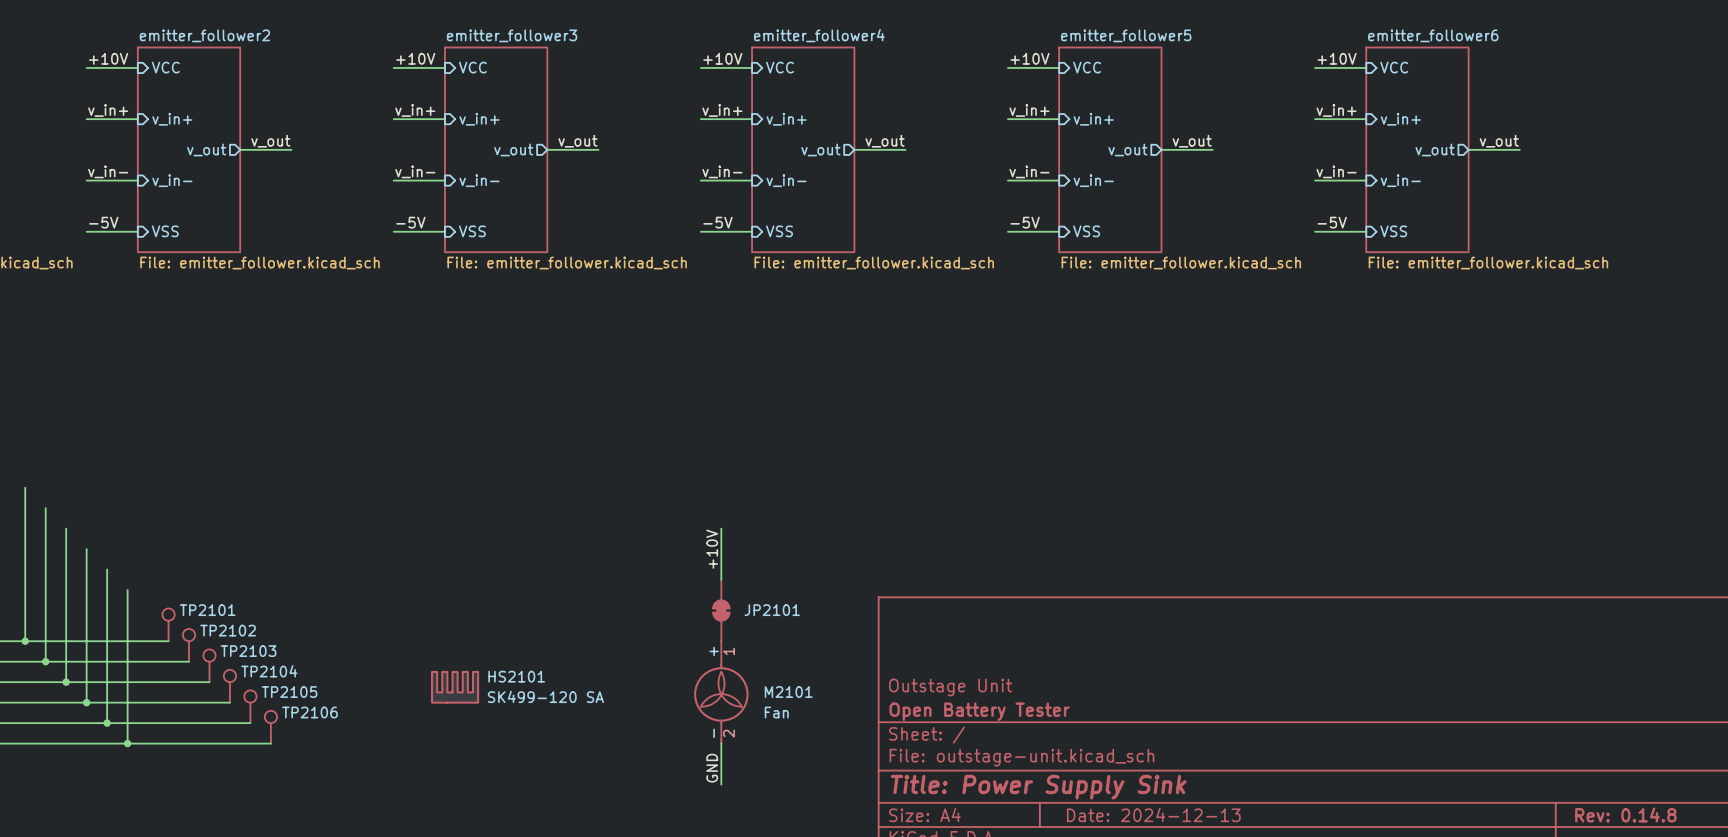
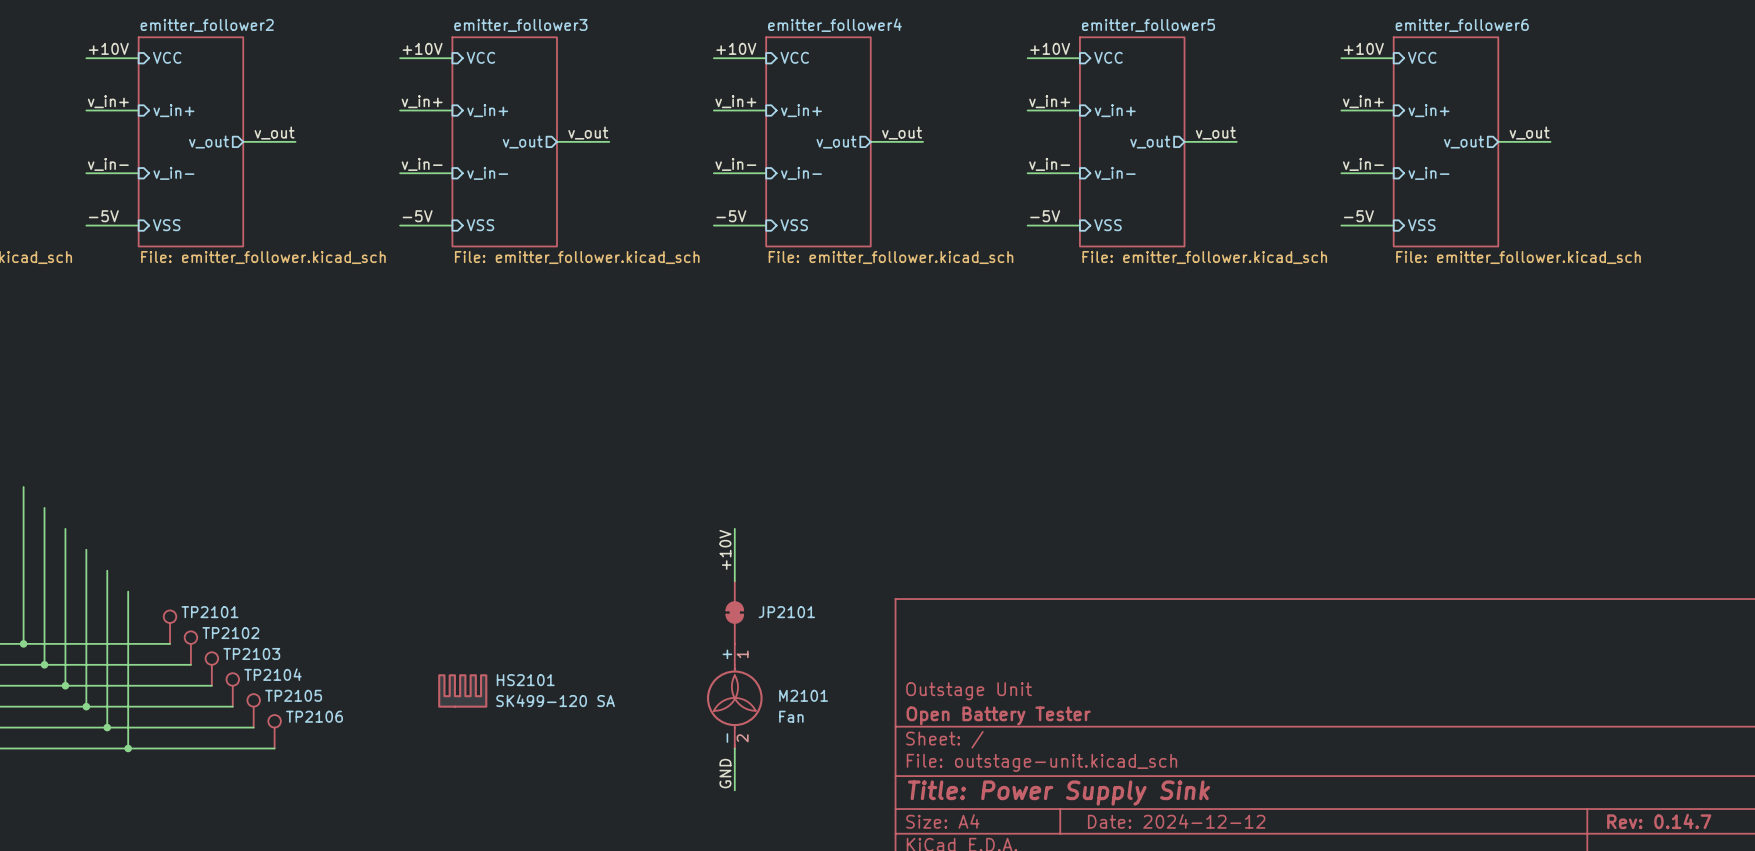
title block: Date: 2024-12-13 (1153, 814) -> Date: 2024-12-12 (1176, 821)
title block: Rev: 0.14.8 (1625, 814) -> Rev: 0.14.7 (1659, 821)

